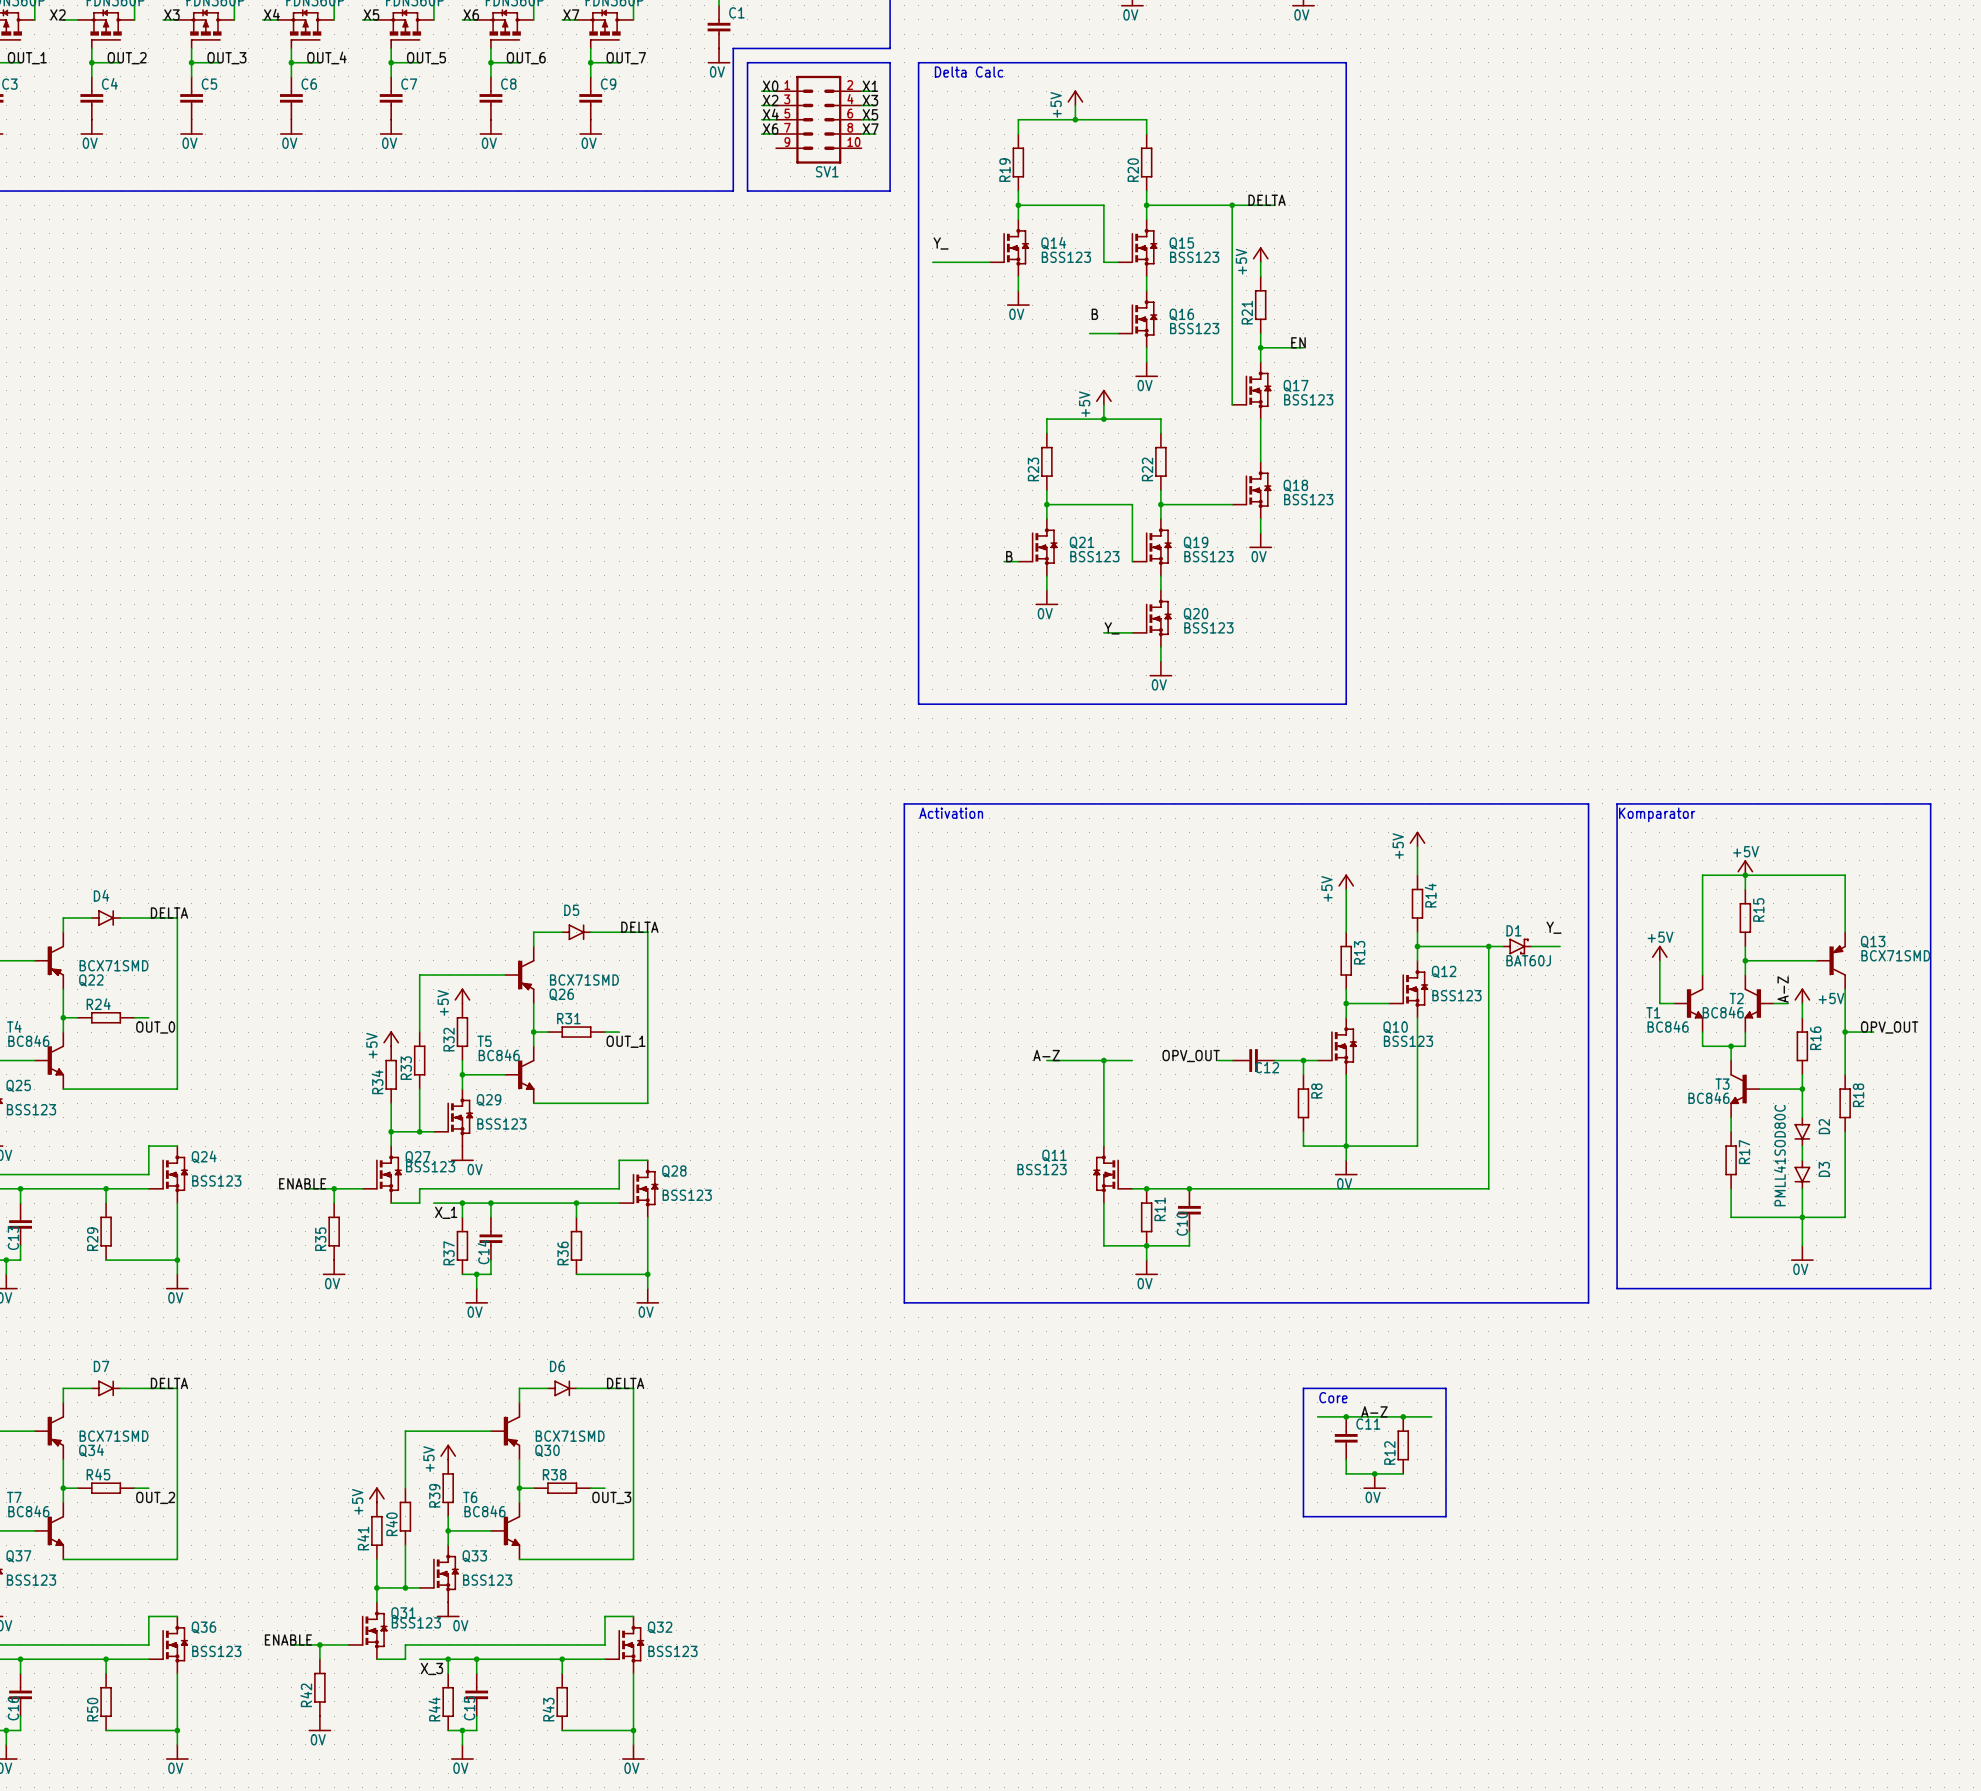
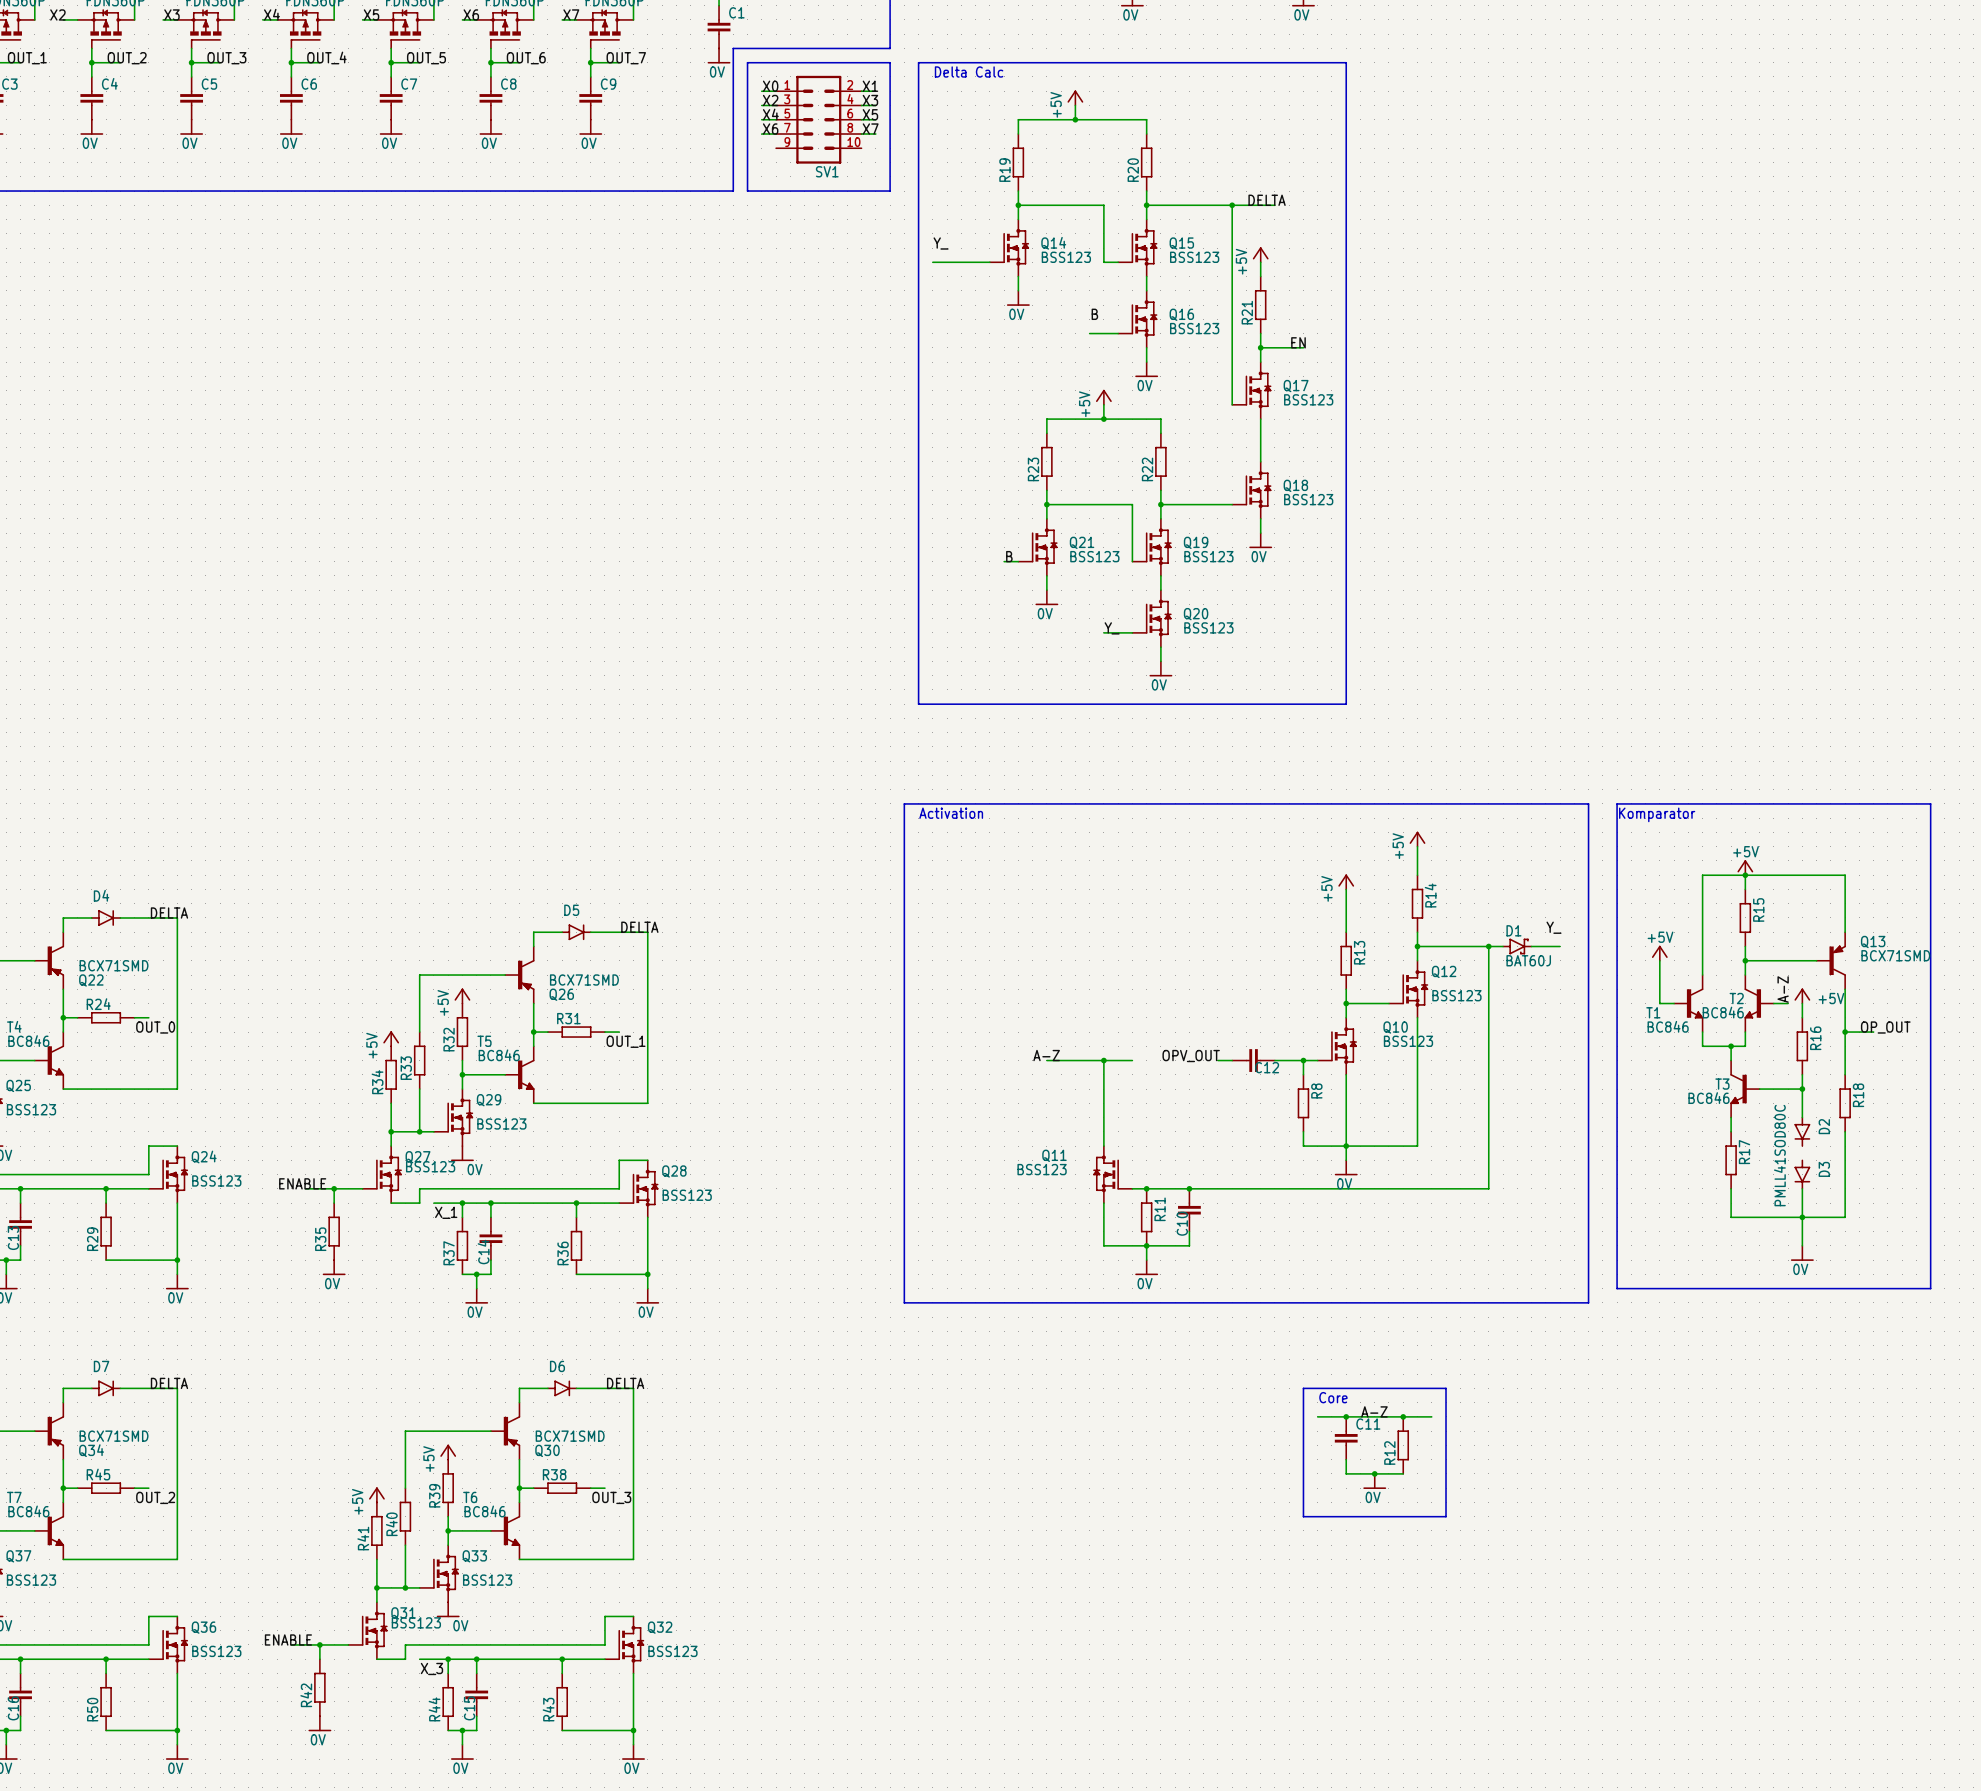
label: OPV_OUT (1889, 1027) -> OP_OUT (1885, 1027)
wire: (1802, 1146) (1802, 1160) -> none

